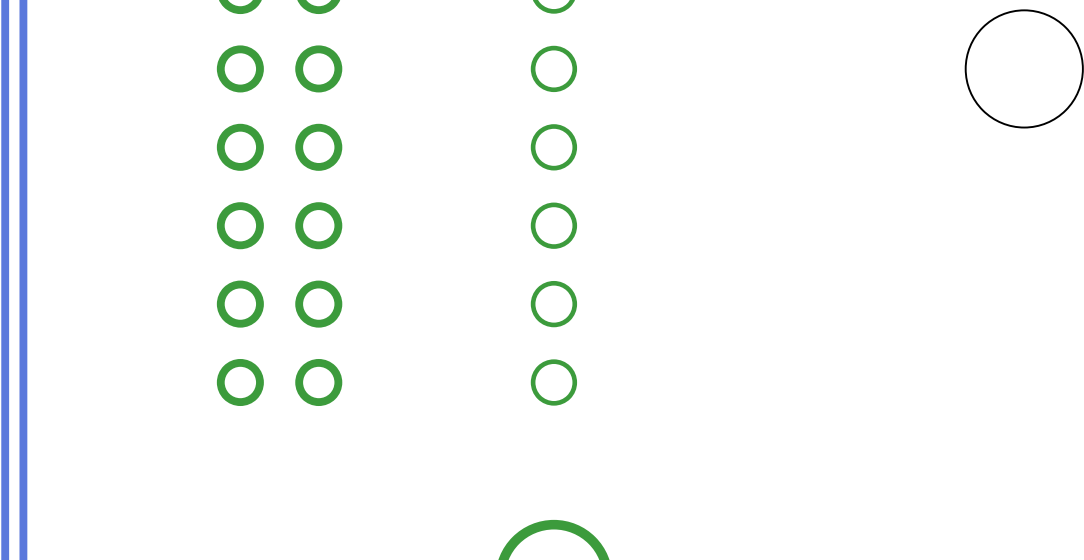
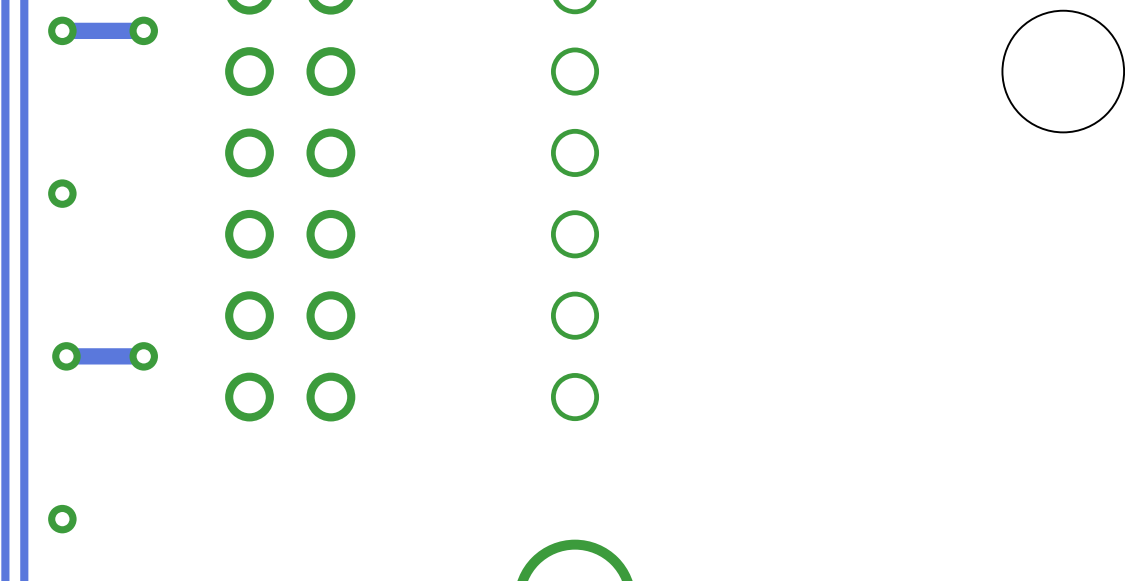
via: none -> (62, 30)
track: none -> (143, 30) (62, 30)
via: none -> (143, 30)
via: none -> (62, 193)
via: none -> (66, 356)
track: none -> (143, 356) (66, 356)
via: none -> (143, 356)
via: none -> (62, 519)

